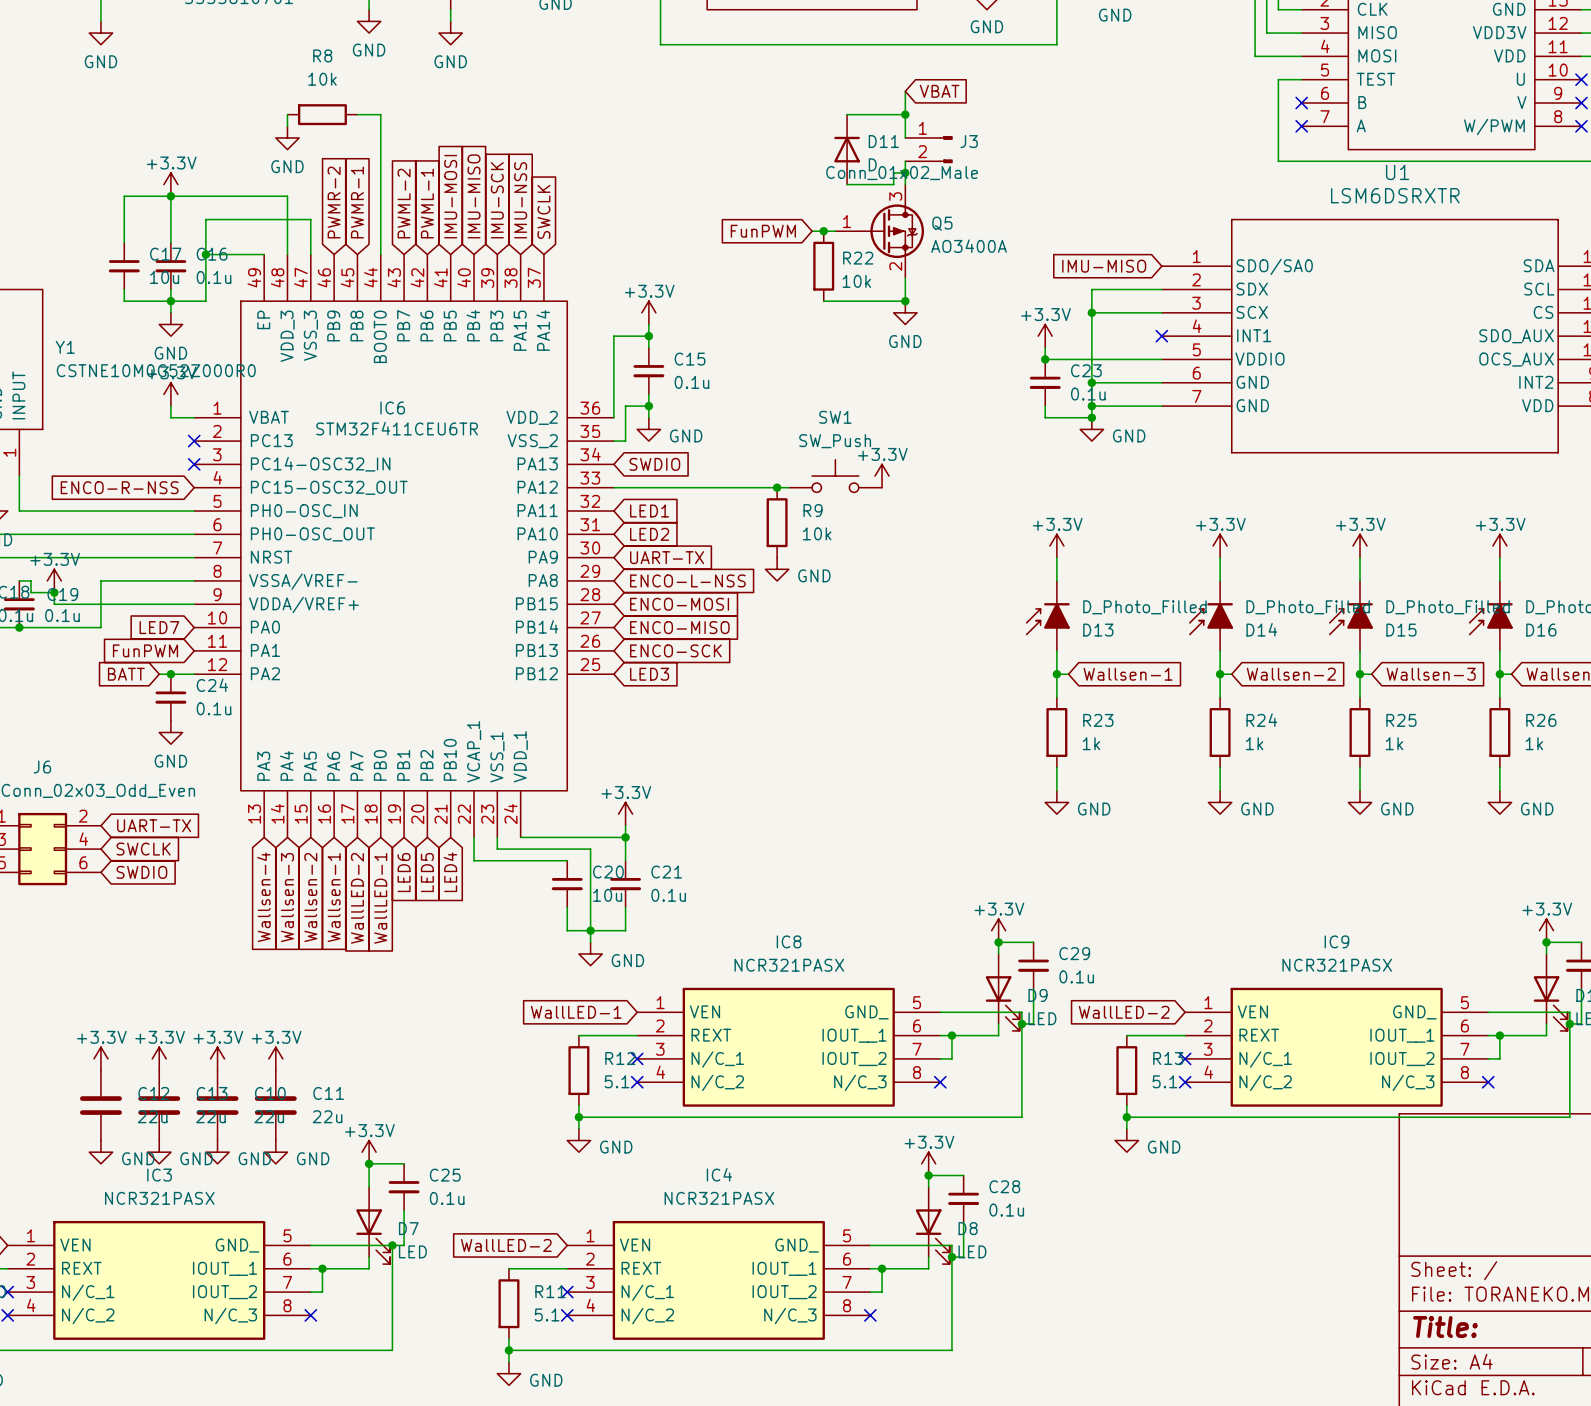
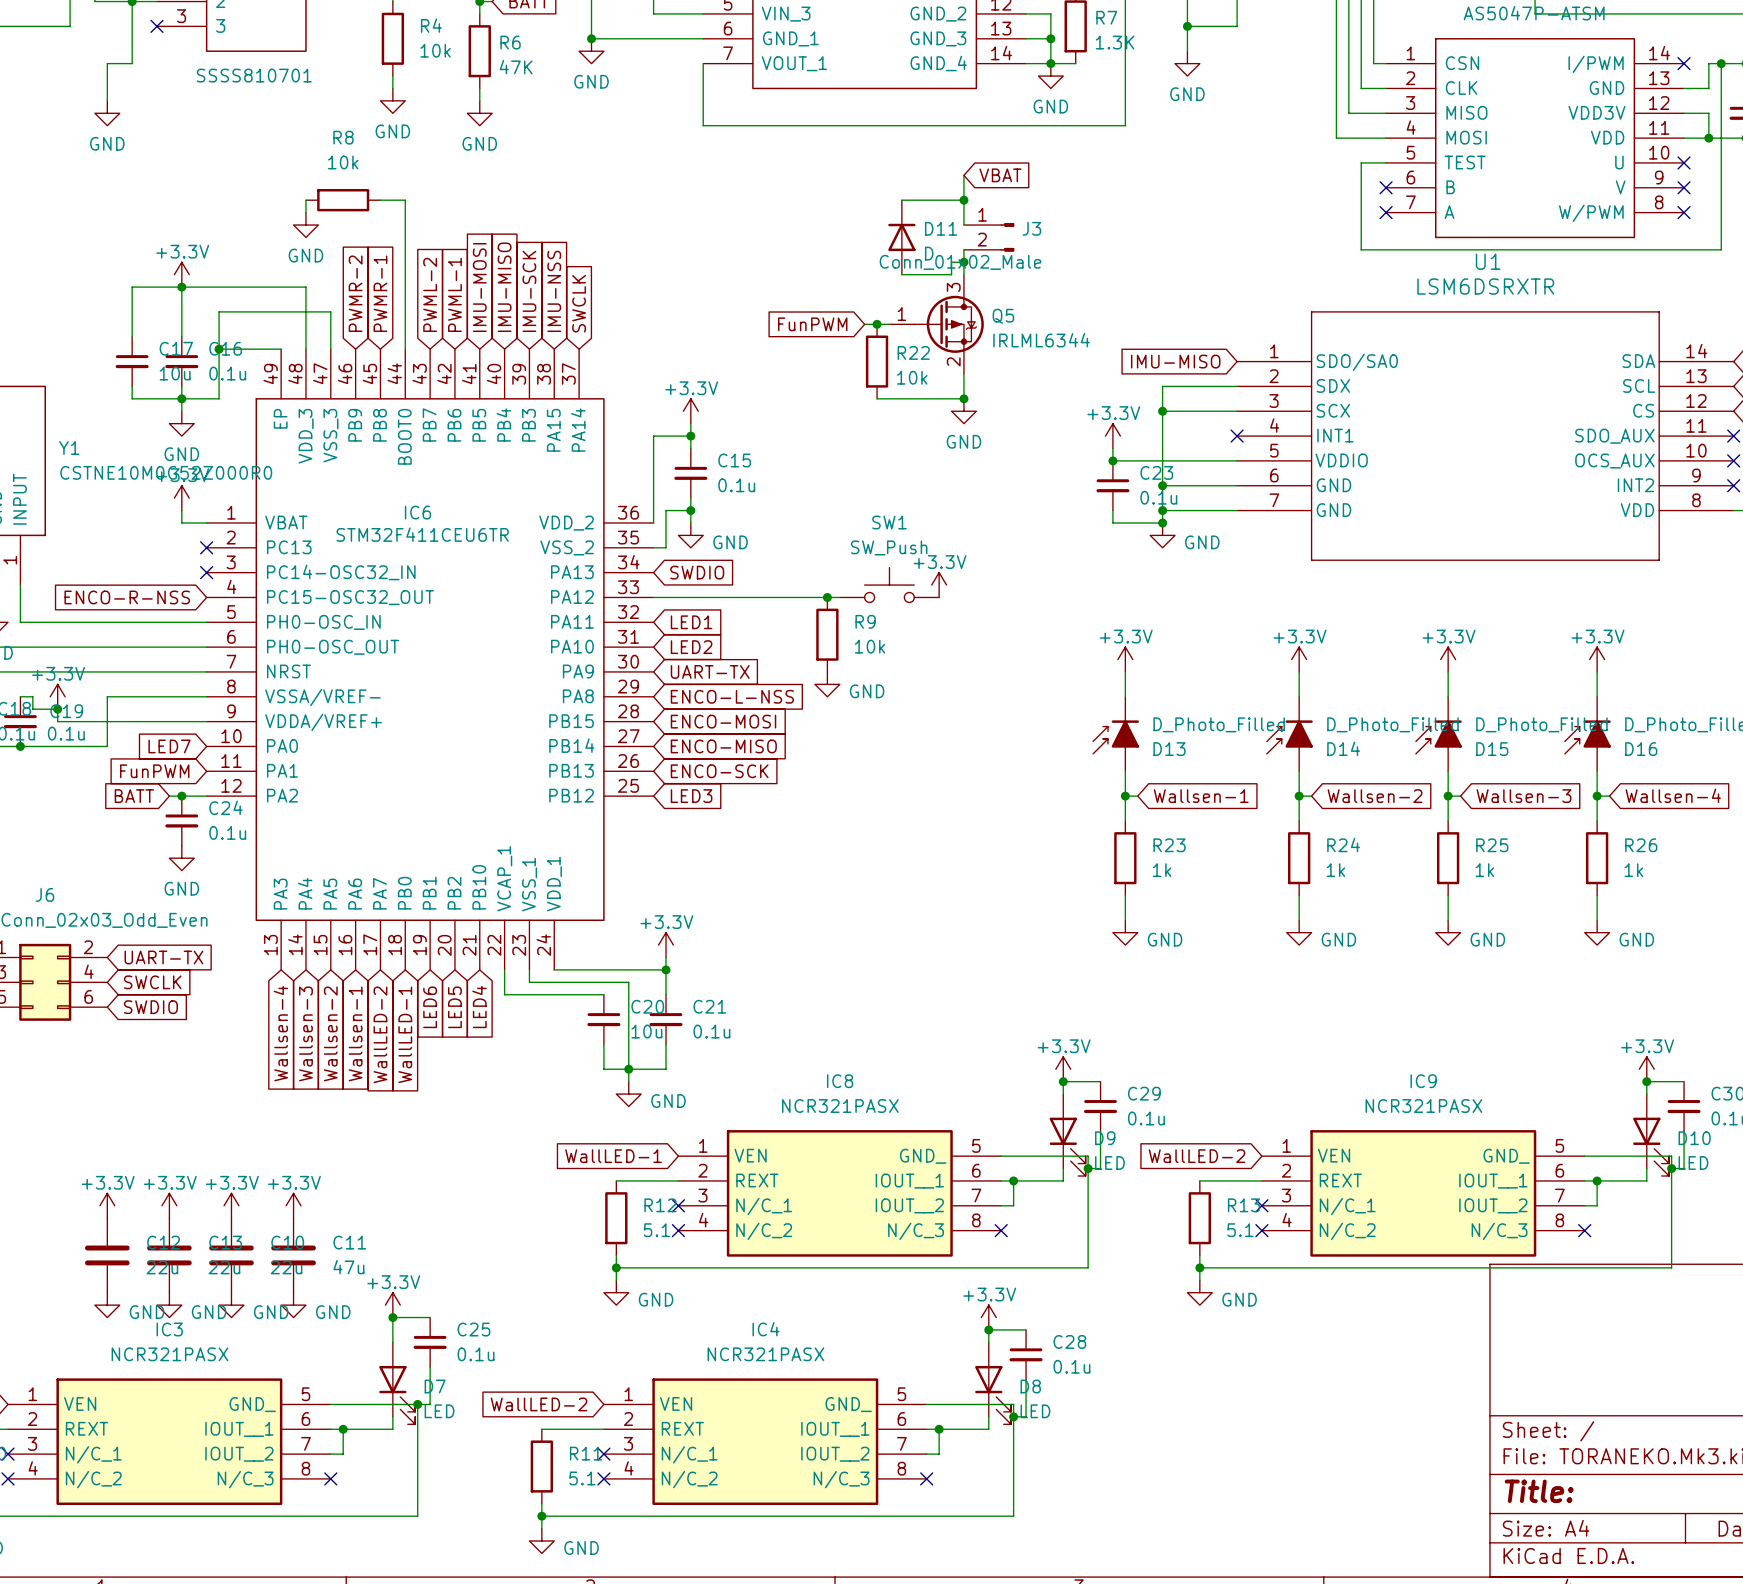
Q5 value: AO3400A (969, 246) -> IRLML6344 (1041, 340)
C11 value: 22u (327, 1116) -> 47u (348, 1267)

